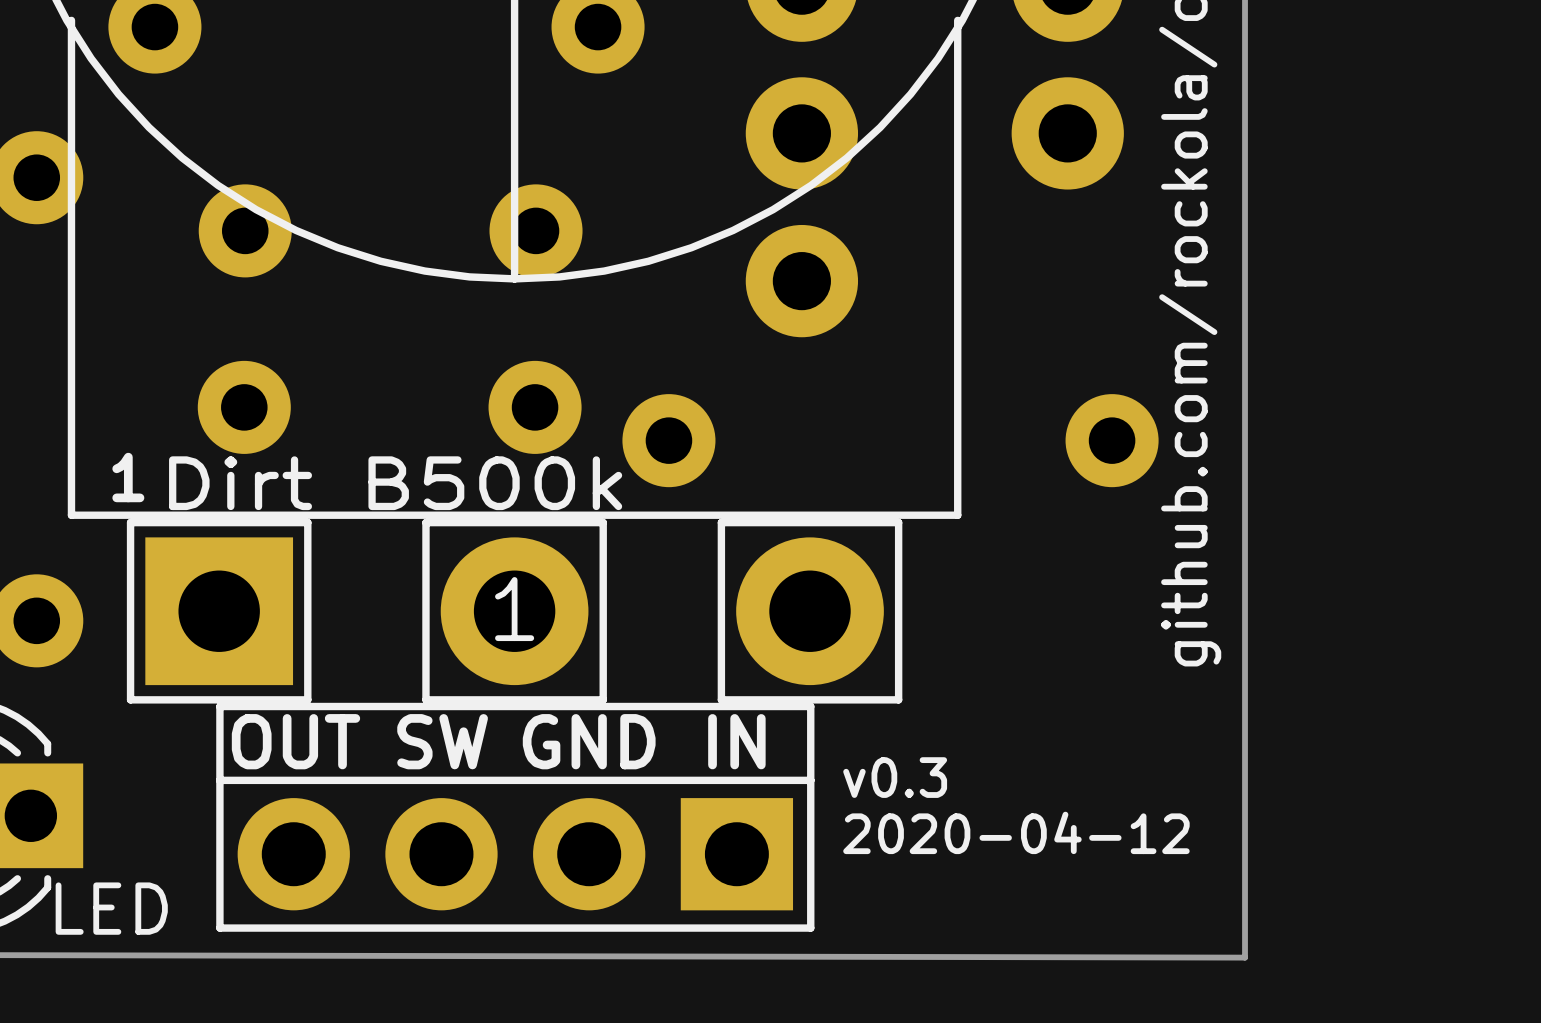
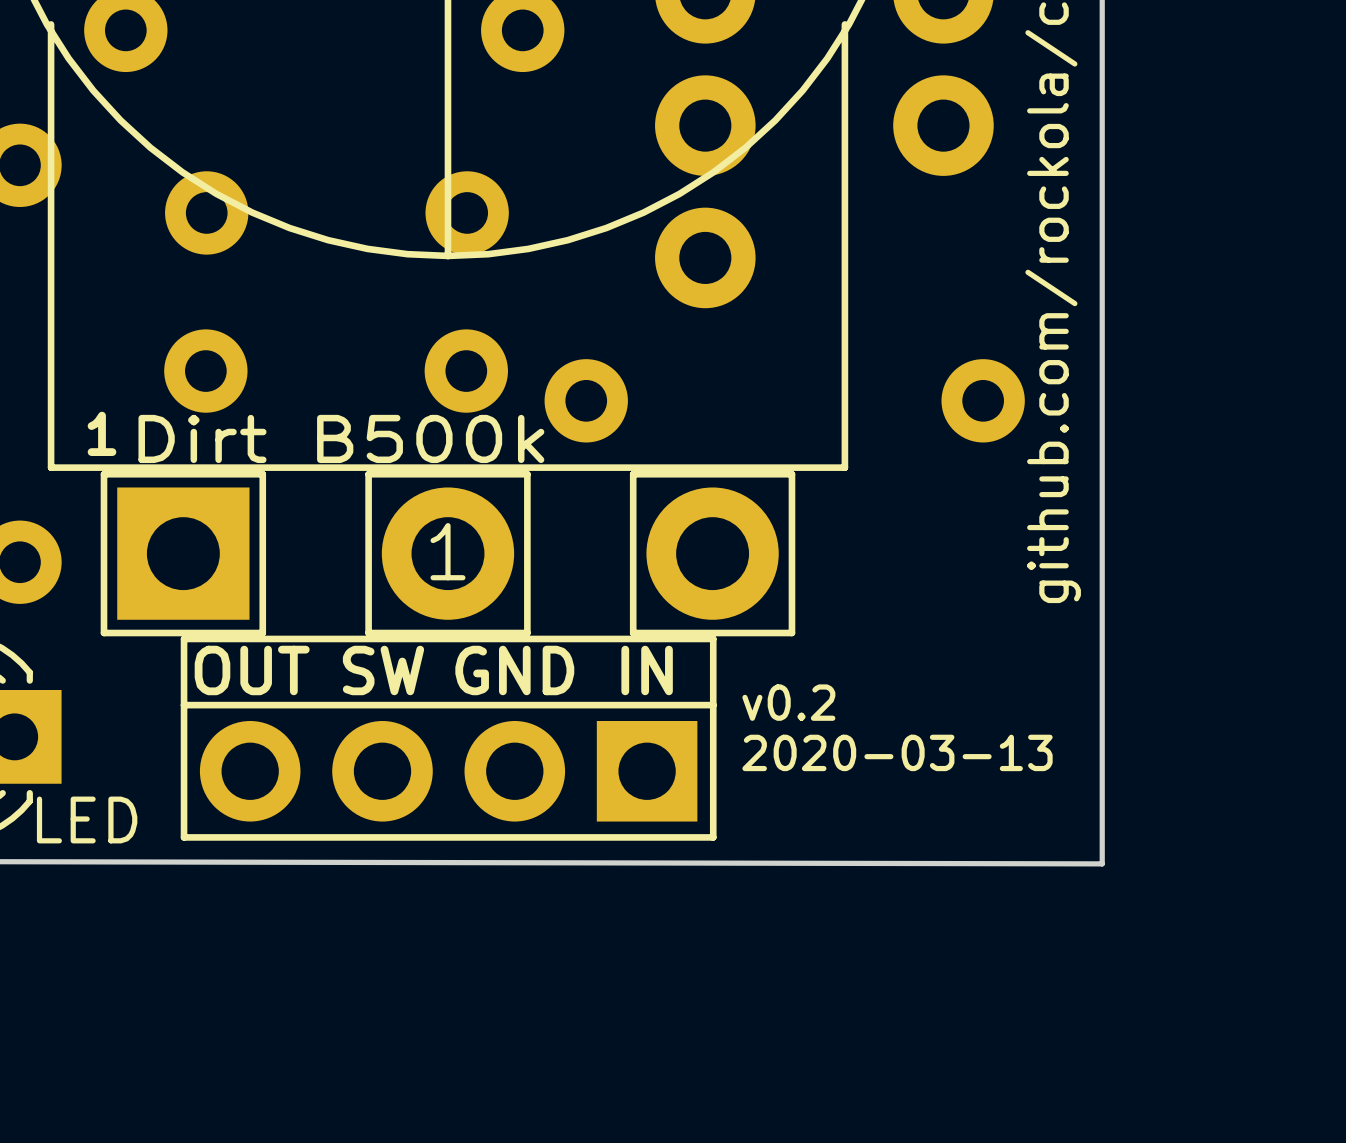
text: v0.3 (895, 777) -> v0.2 (788, 702)
text: 2020-04-12 (1016, 832) -> 2020-03-13 (897, 752)

